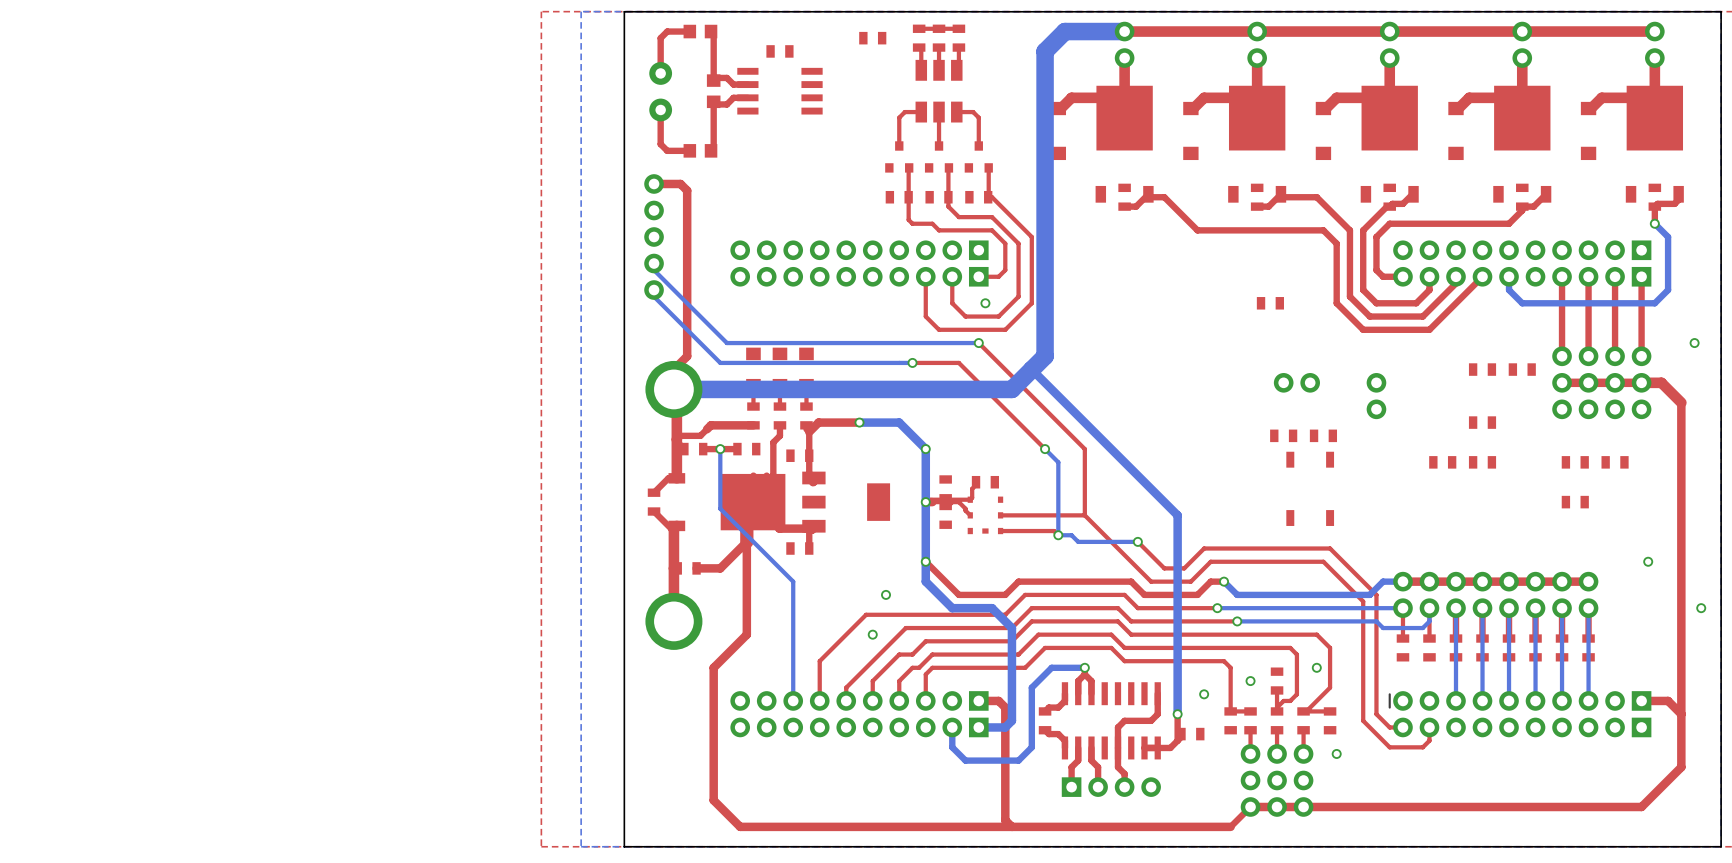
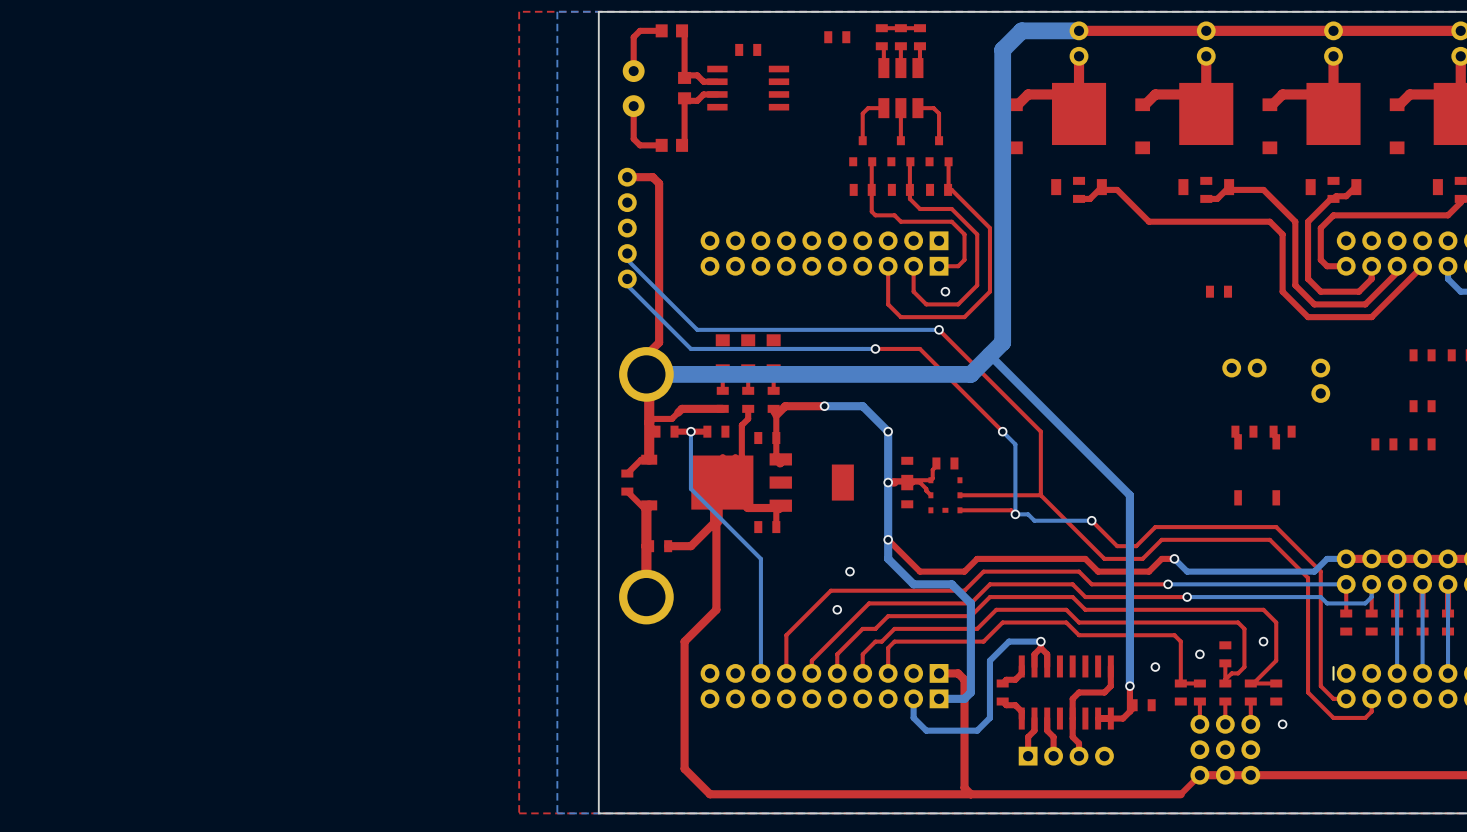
part: (1283, 435) -> none
part: (1323, 435) -> none
part: none -> (1244, 431)
part: none -> (1282, 431)

